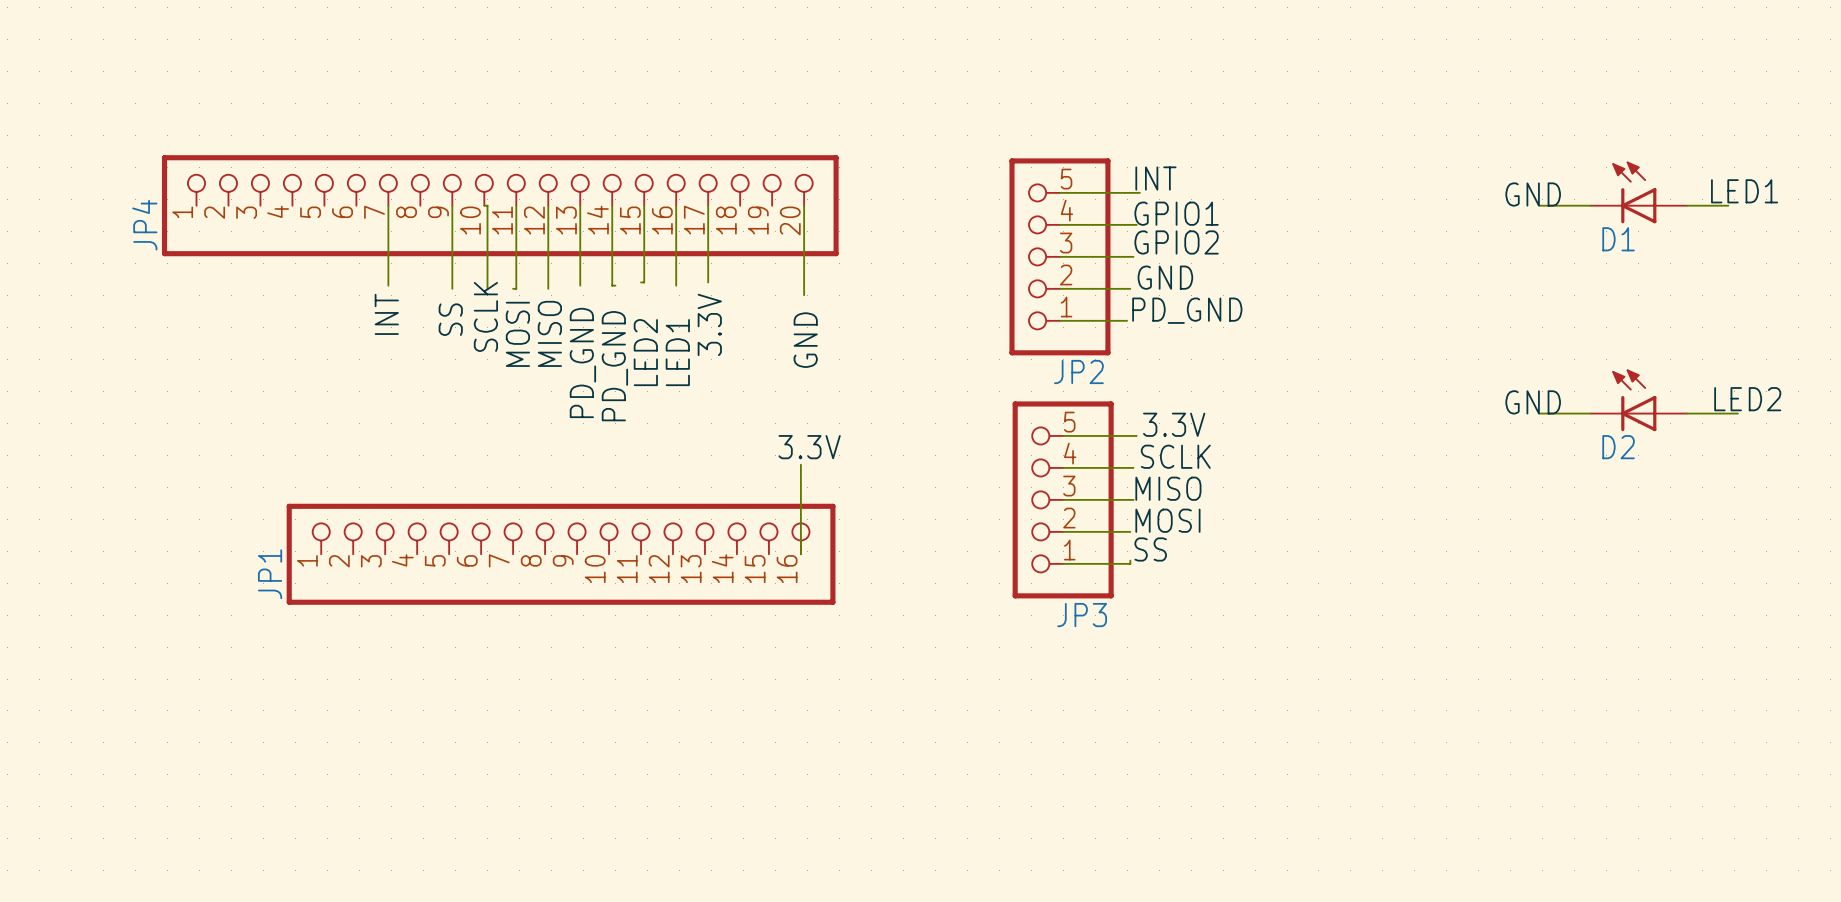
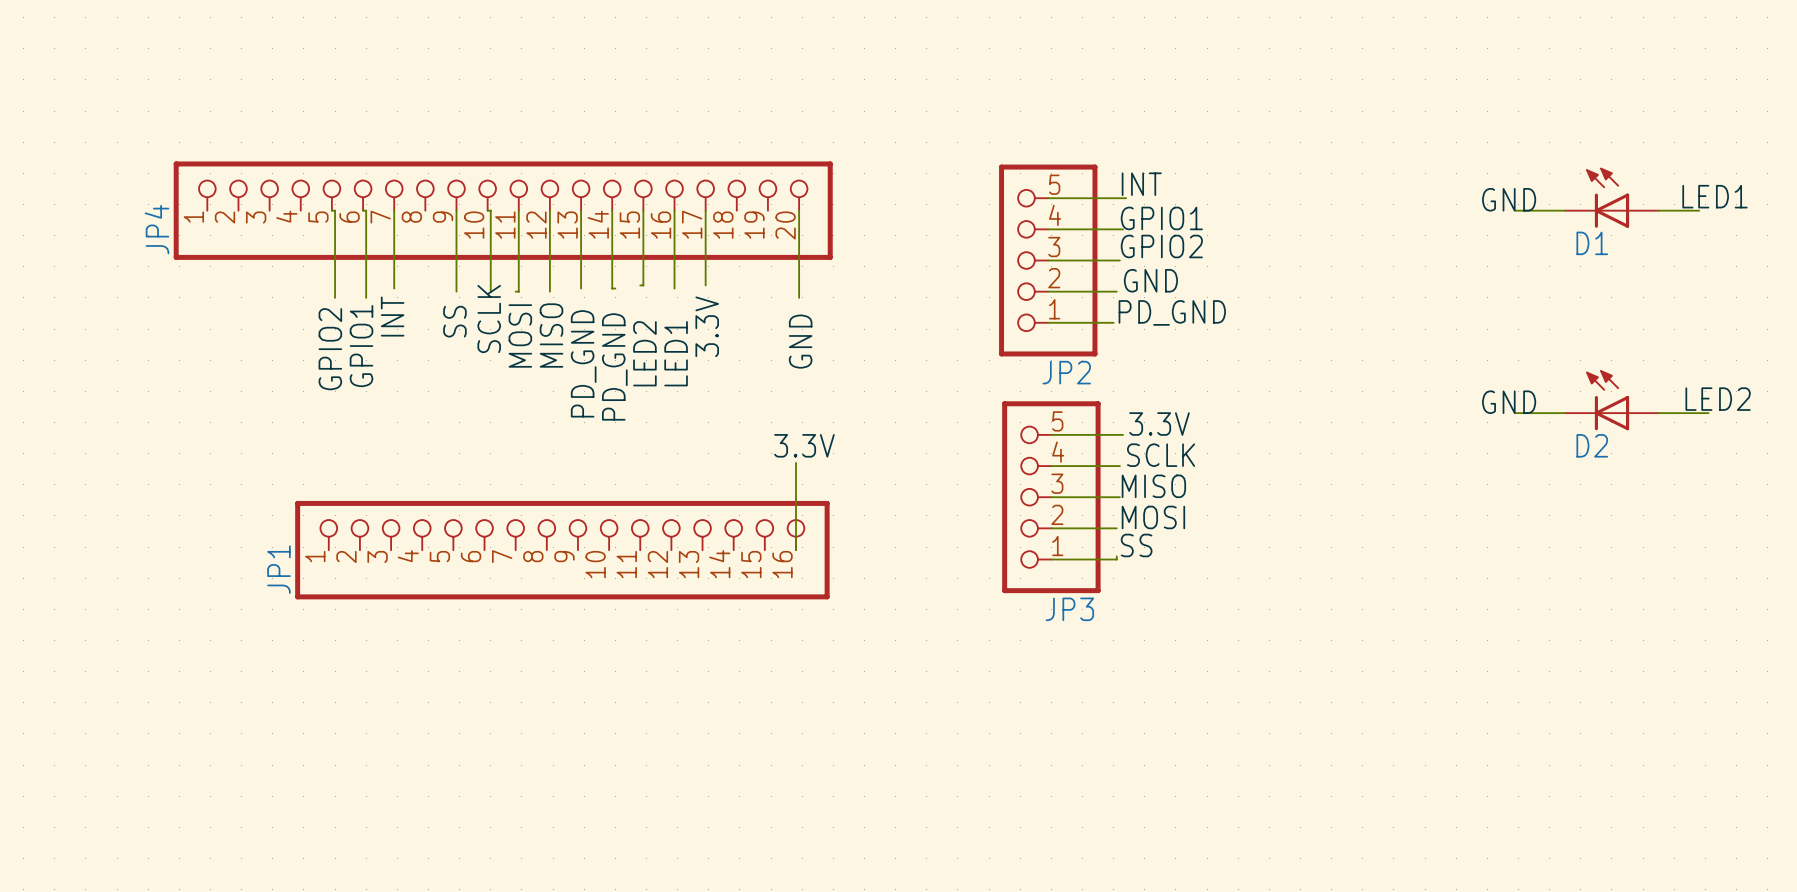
wire: none -> (331, 210) (335, 210) (335, 297)
wire: none -> (363, 210) (366, 210) (366, 297)
label: none -> GPIO1 (361, 346)
label: none -> GPIO2 (330, 349)

